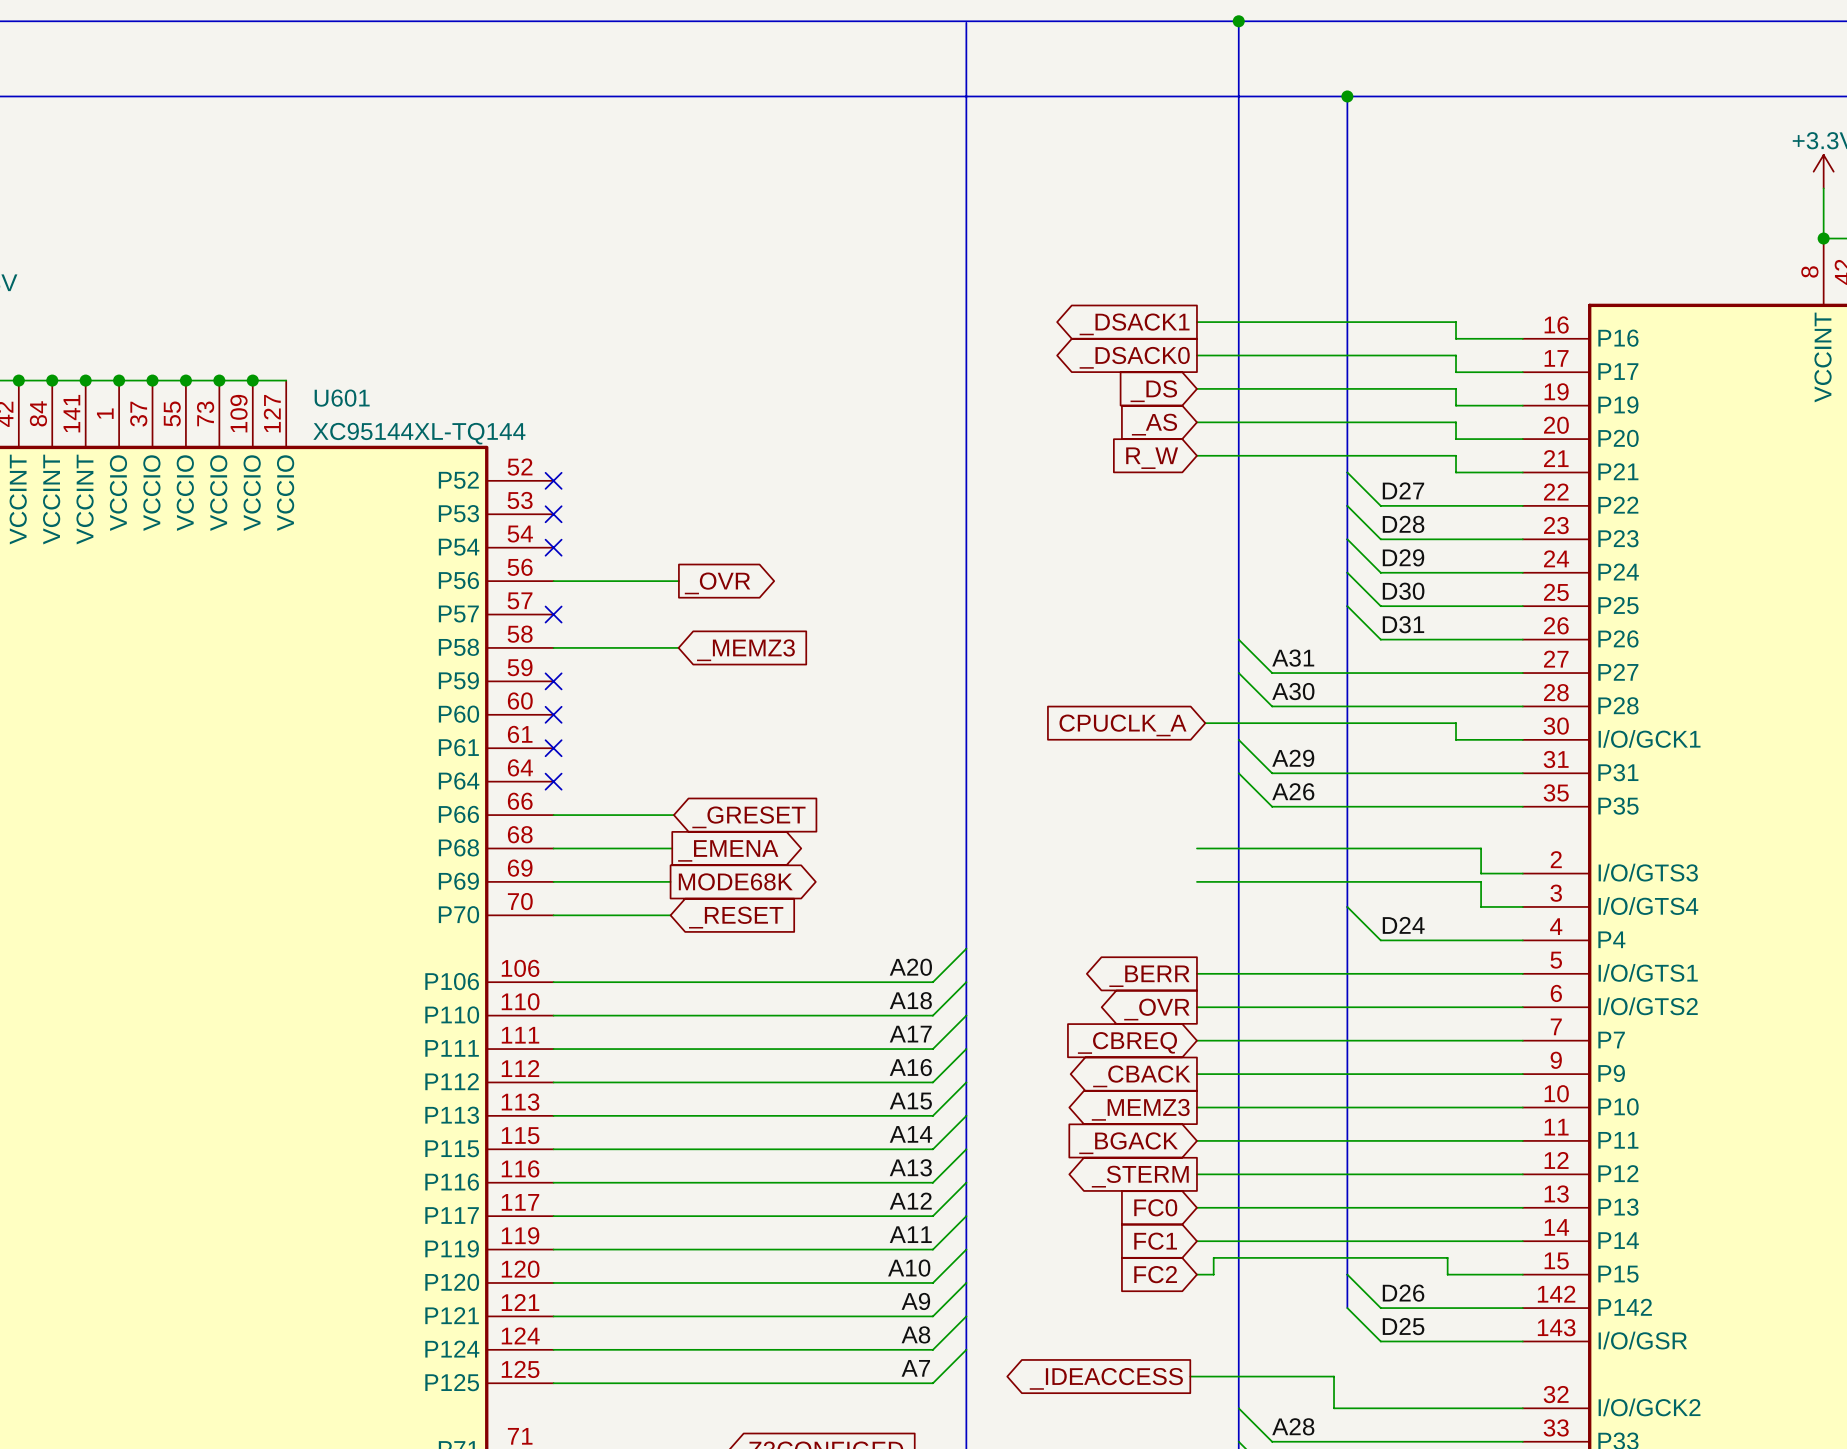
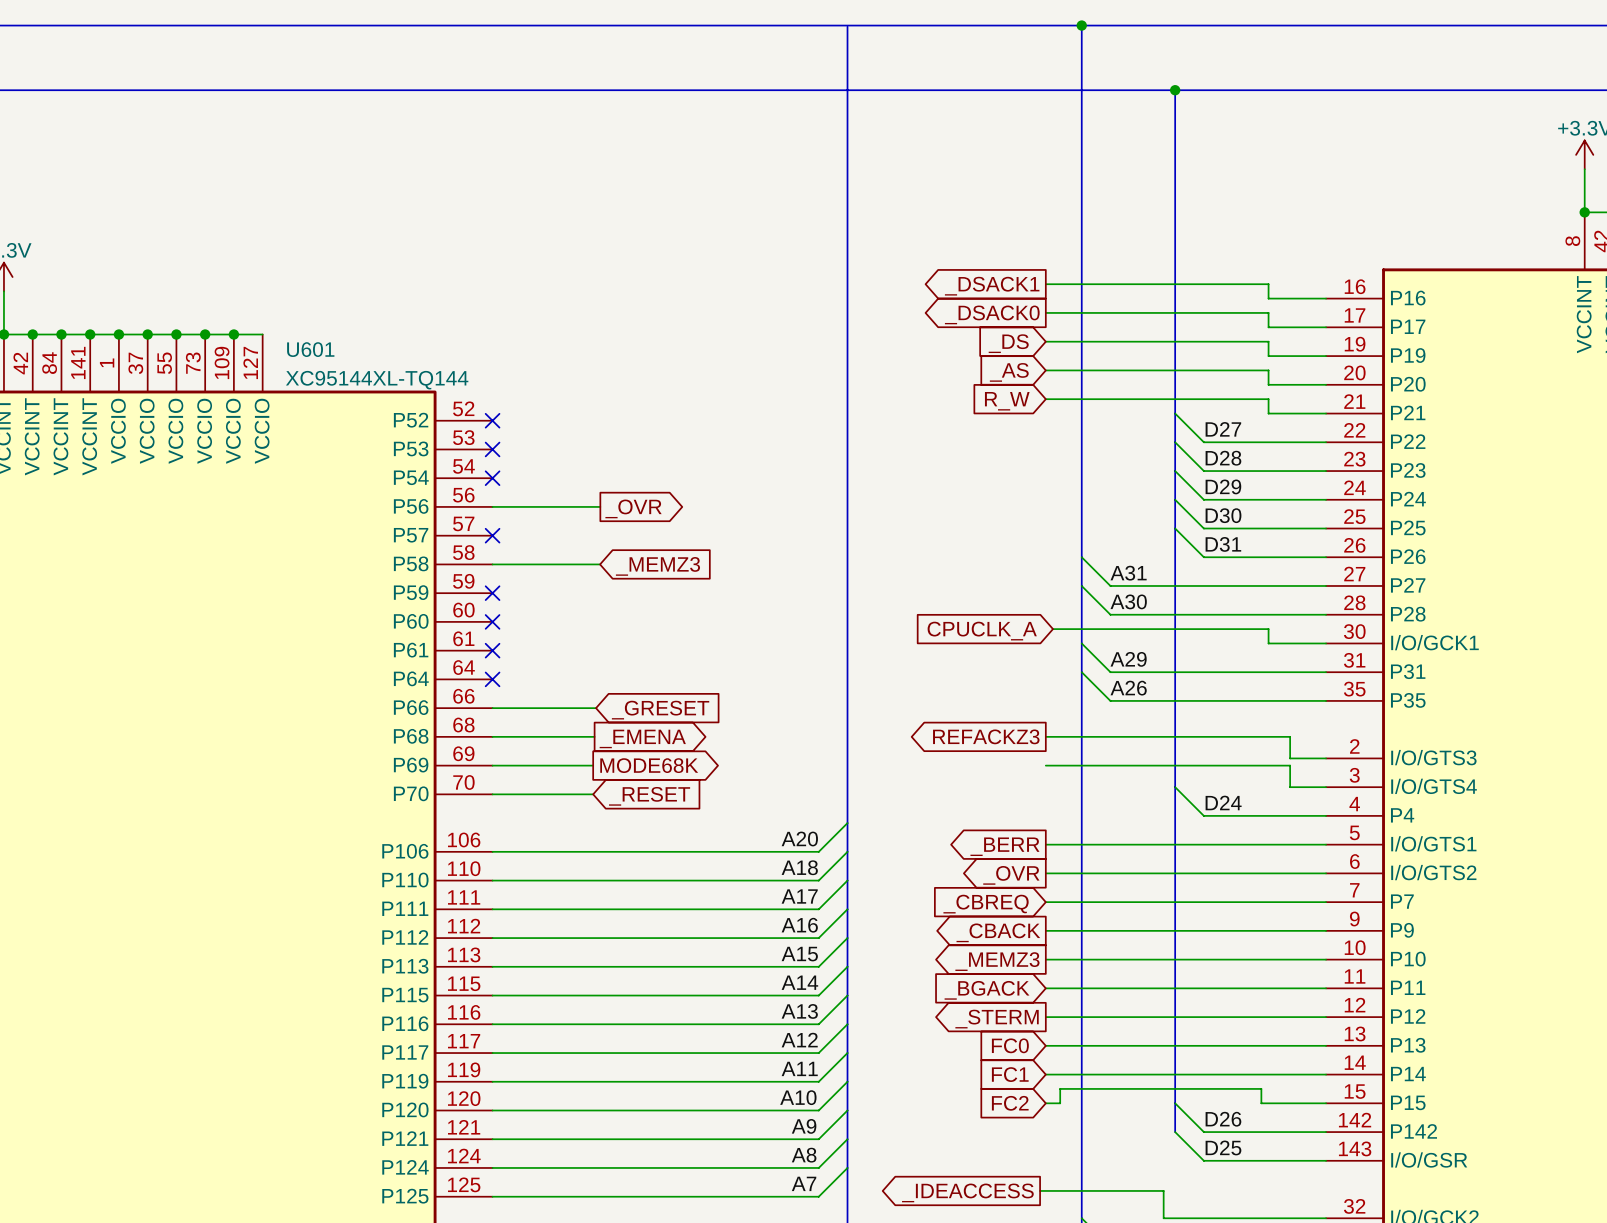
global label: none -> REFACKZ3 (986, 736)

